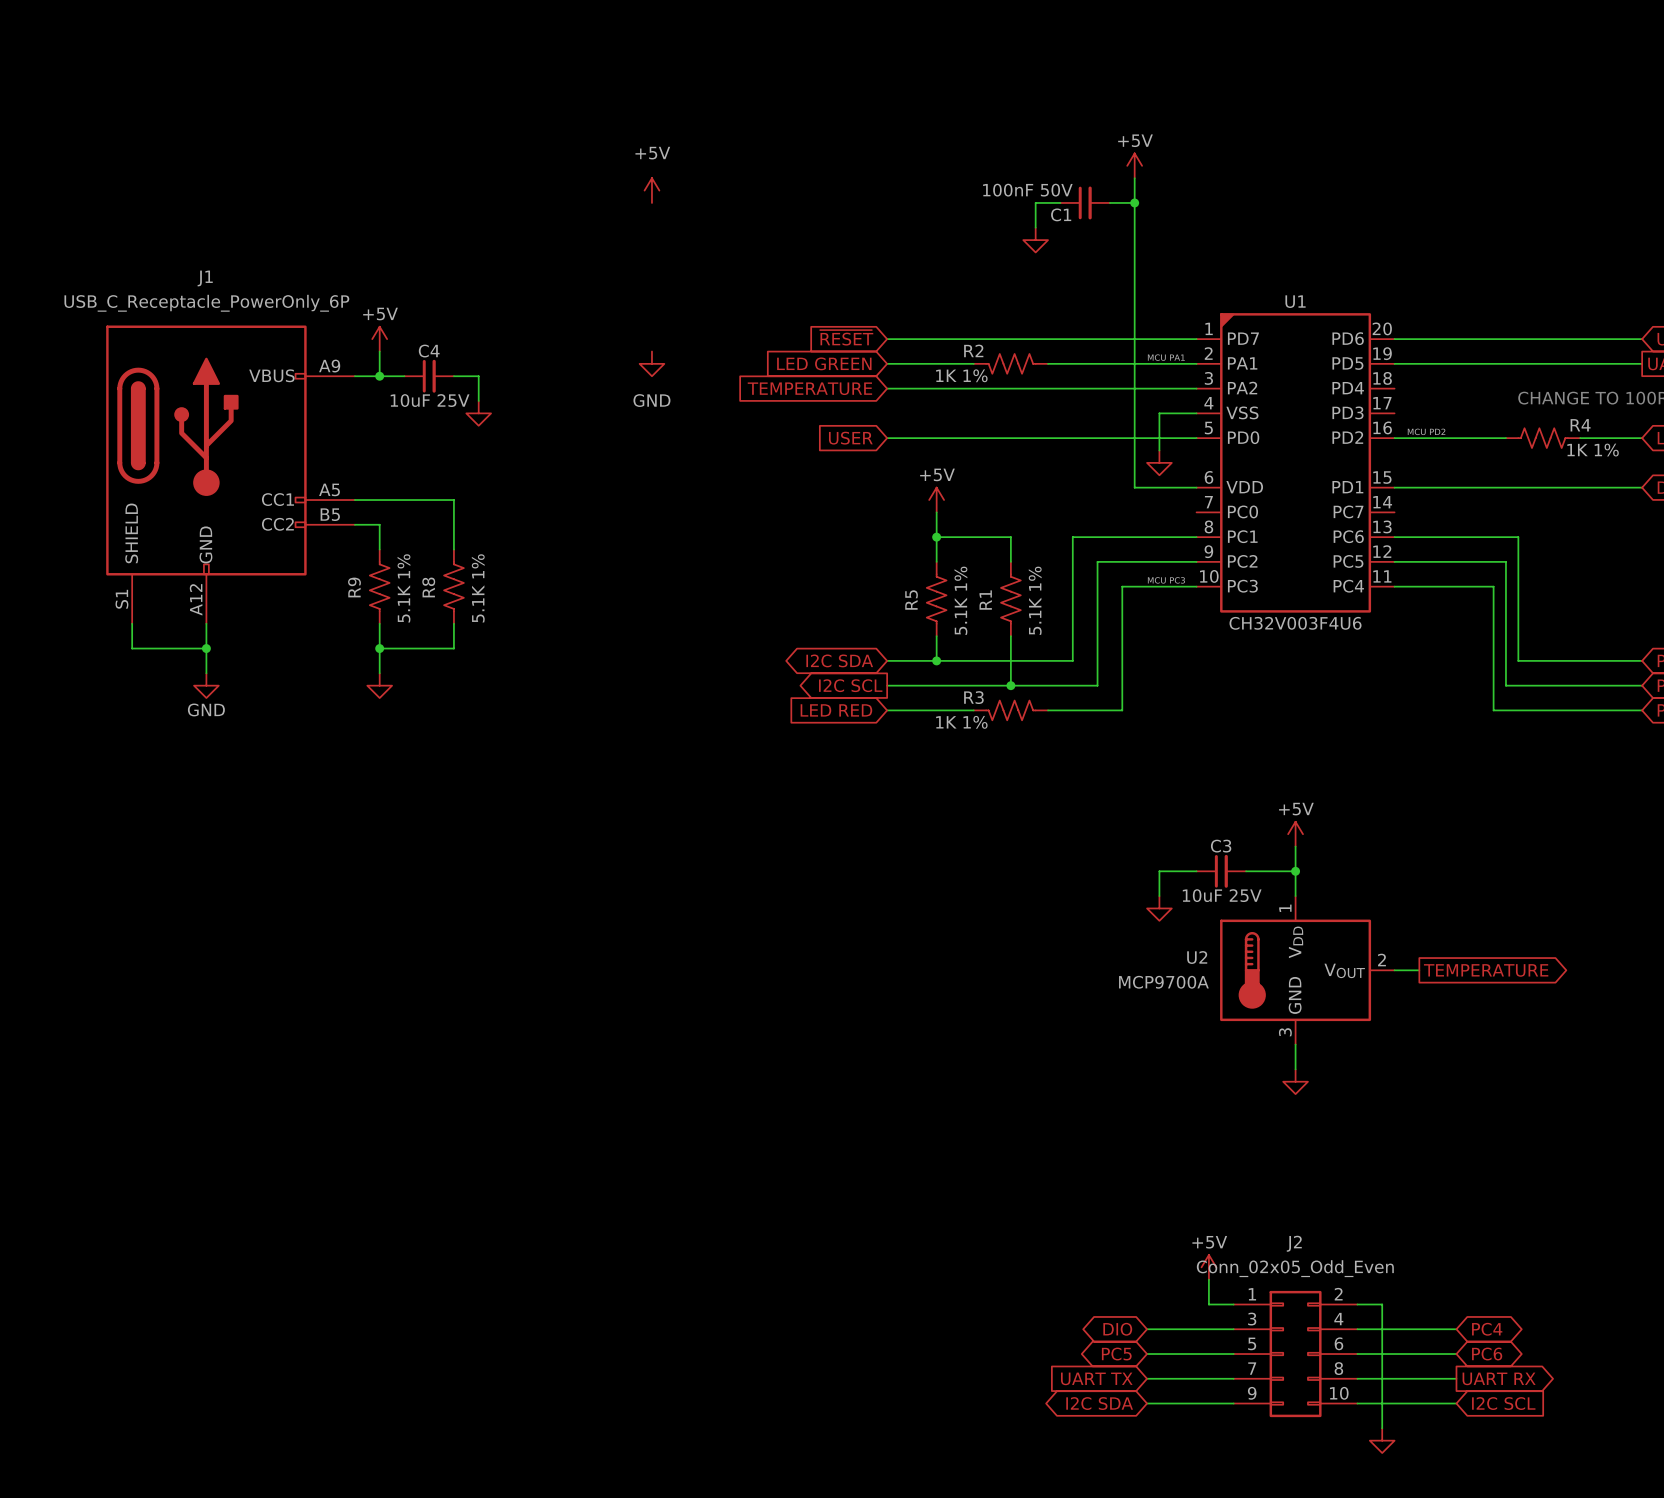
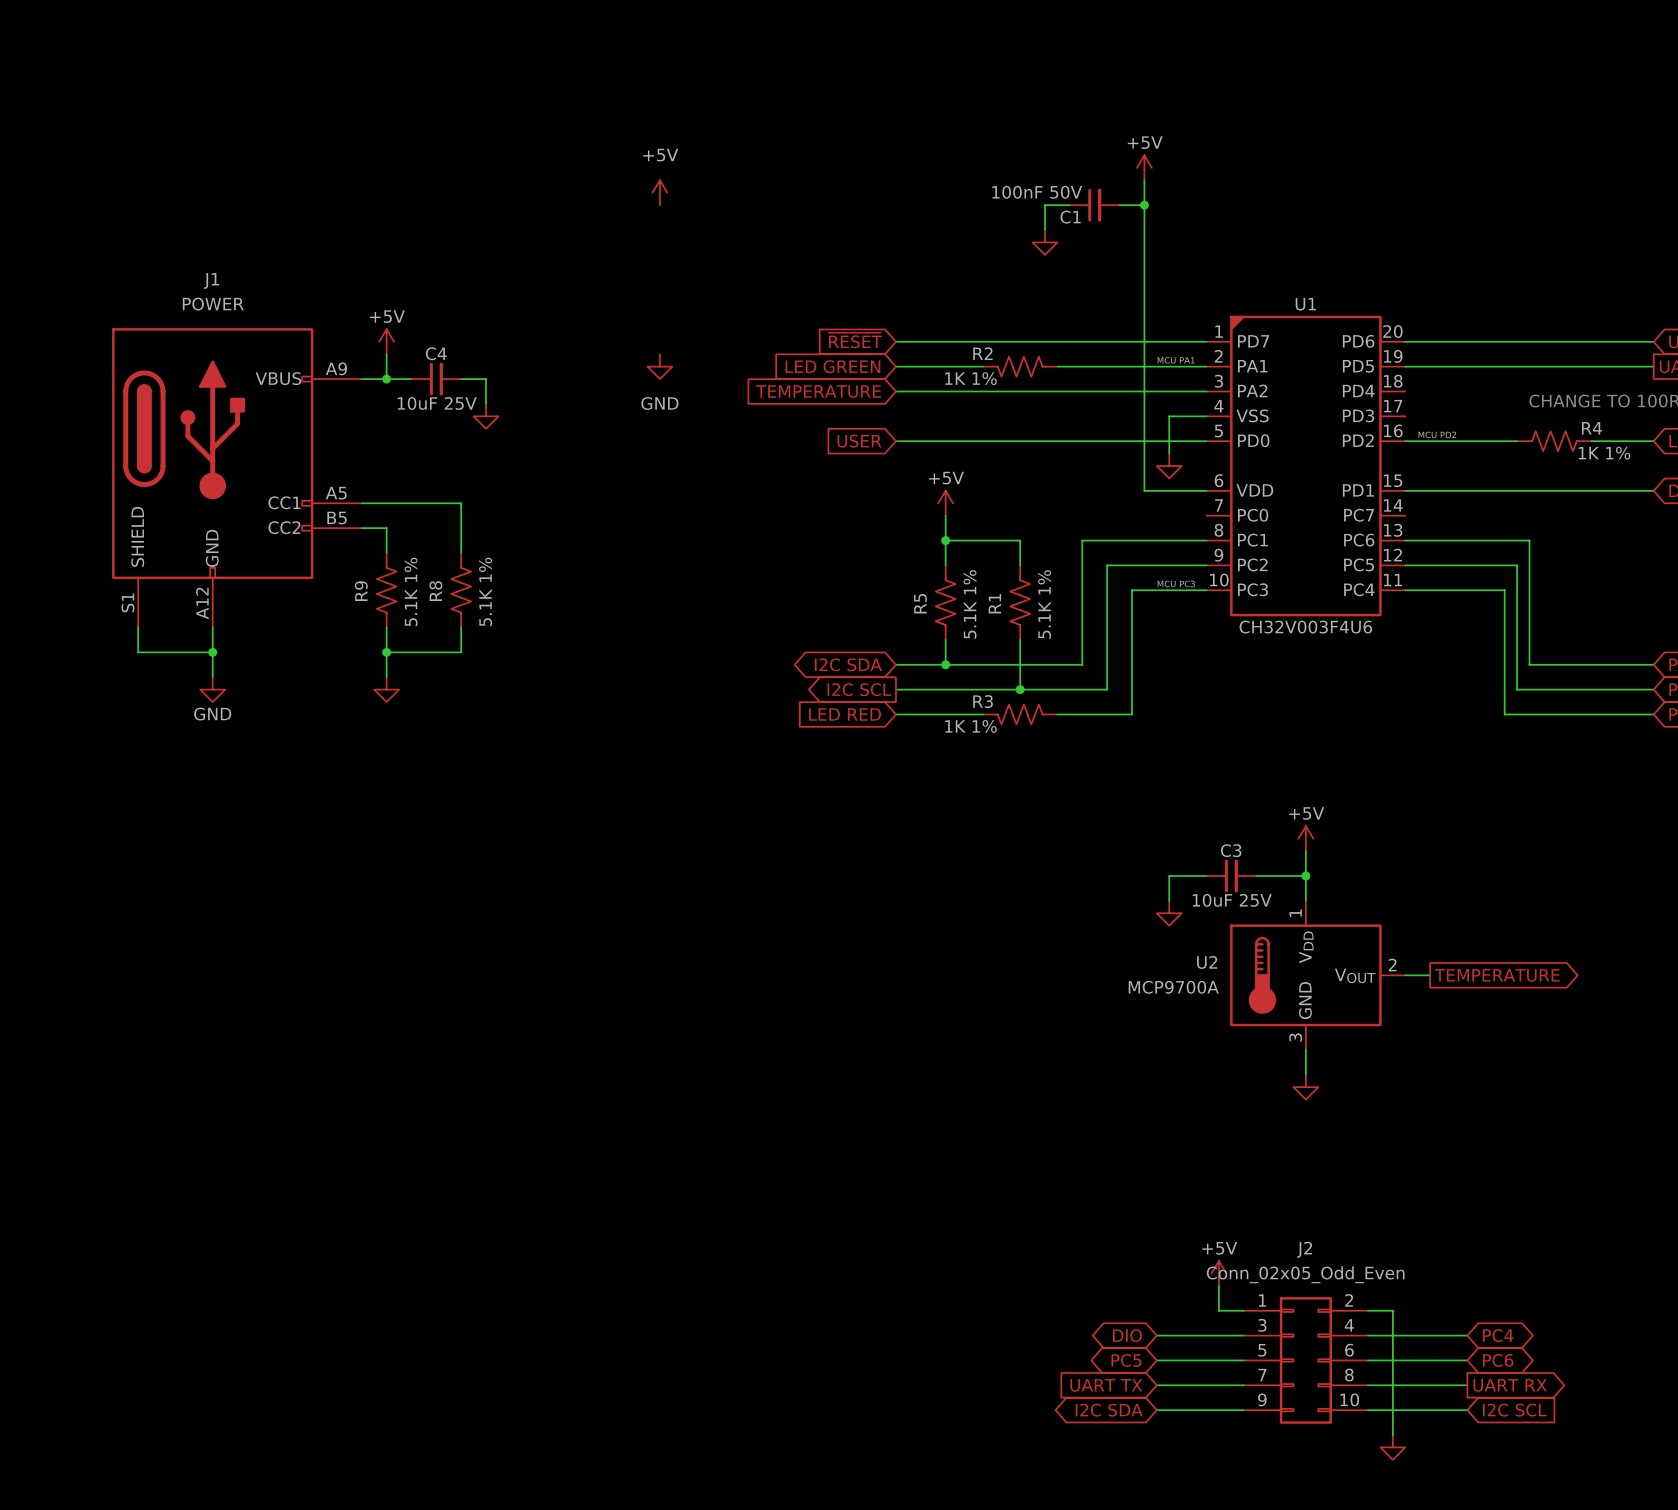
J1 value: USB_C_Receptacle_PowerOnly_6P (206, 303) -> POWER (213, 304)

